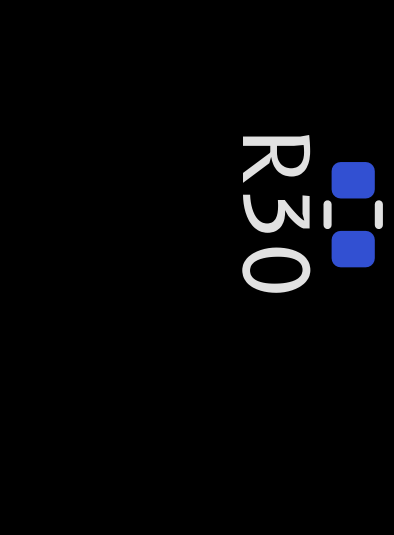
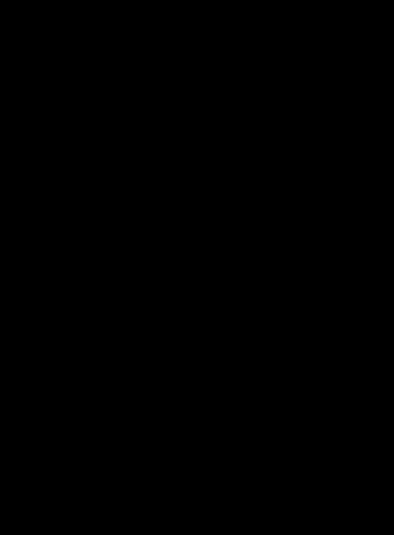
R30: (353, 214) -> none

